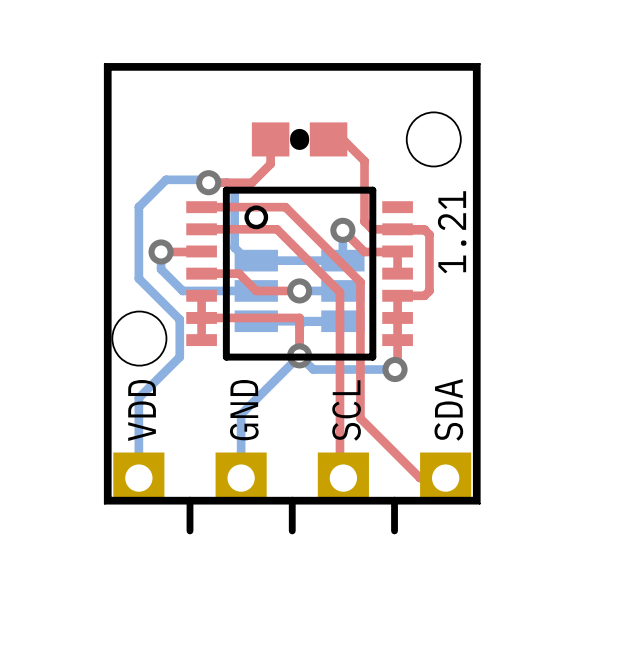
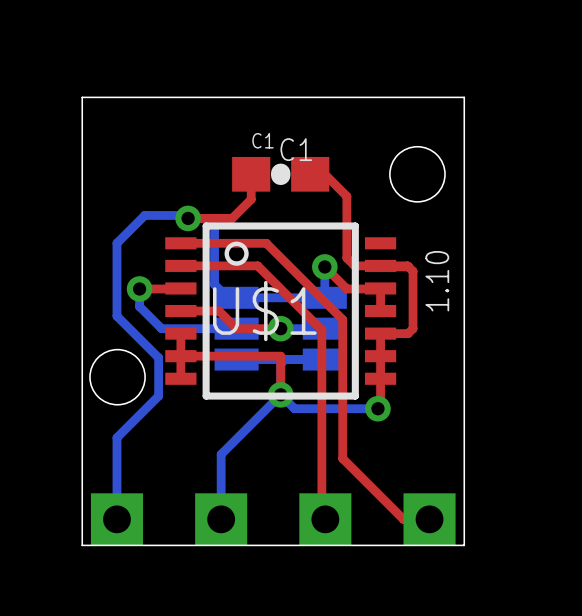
line: (108, 67) (108, 500) (476, 500) (476, 67) (108, 67) -> none
C1 name: none -> C1 (262, 140)
text: none -> C1 (296, 149)
text: 1.21 (452, 232) -> 1.10 (437, 281)
U$1 name: none -> U$1 (264, 311)
text: SDA (448, 409) -> none
text: VDD (142, 410) -> none
text: GND (244, 410) -> none
text: SCL (346, 410) -> none
line: (190, 500) (190, 530) -> none
line: (292, 500) (292, 530) -> none
line: (394, 500) (394, 530) -> none

